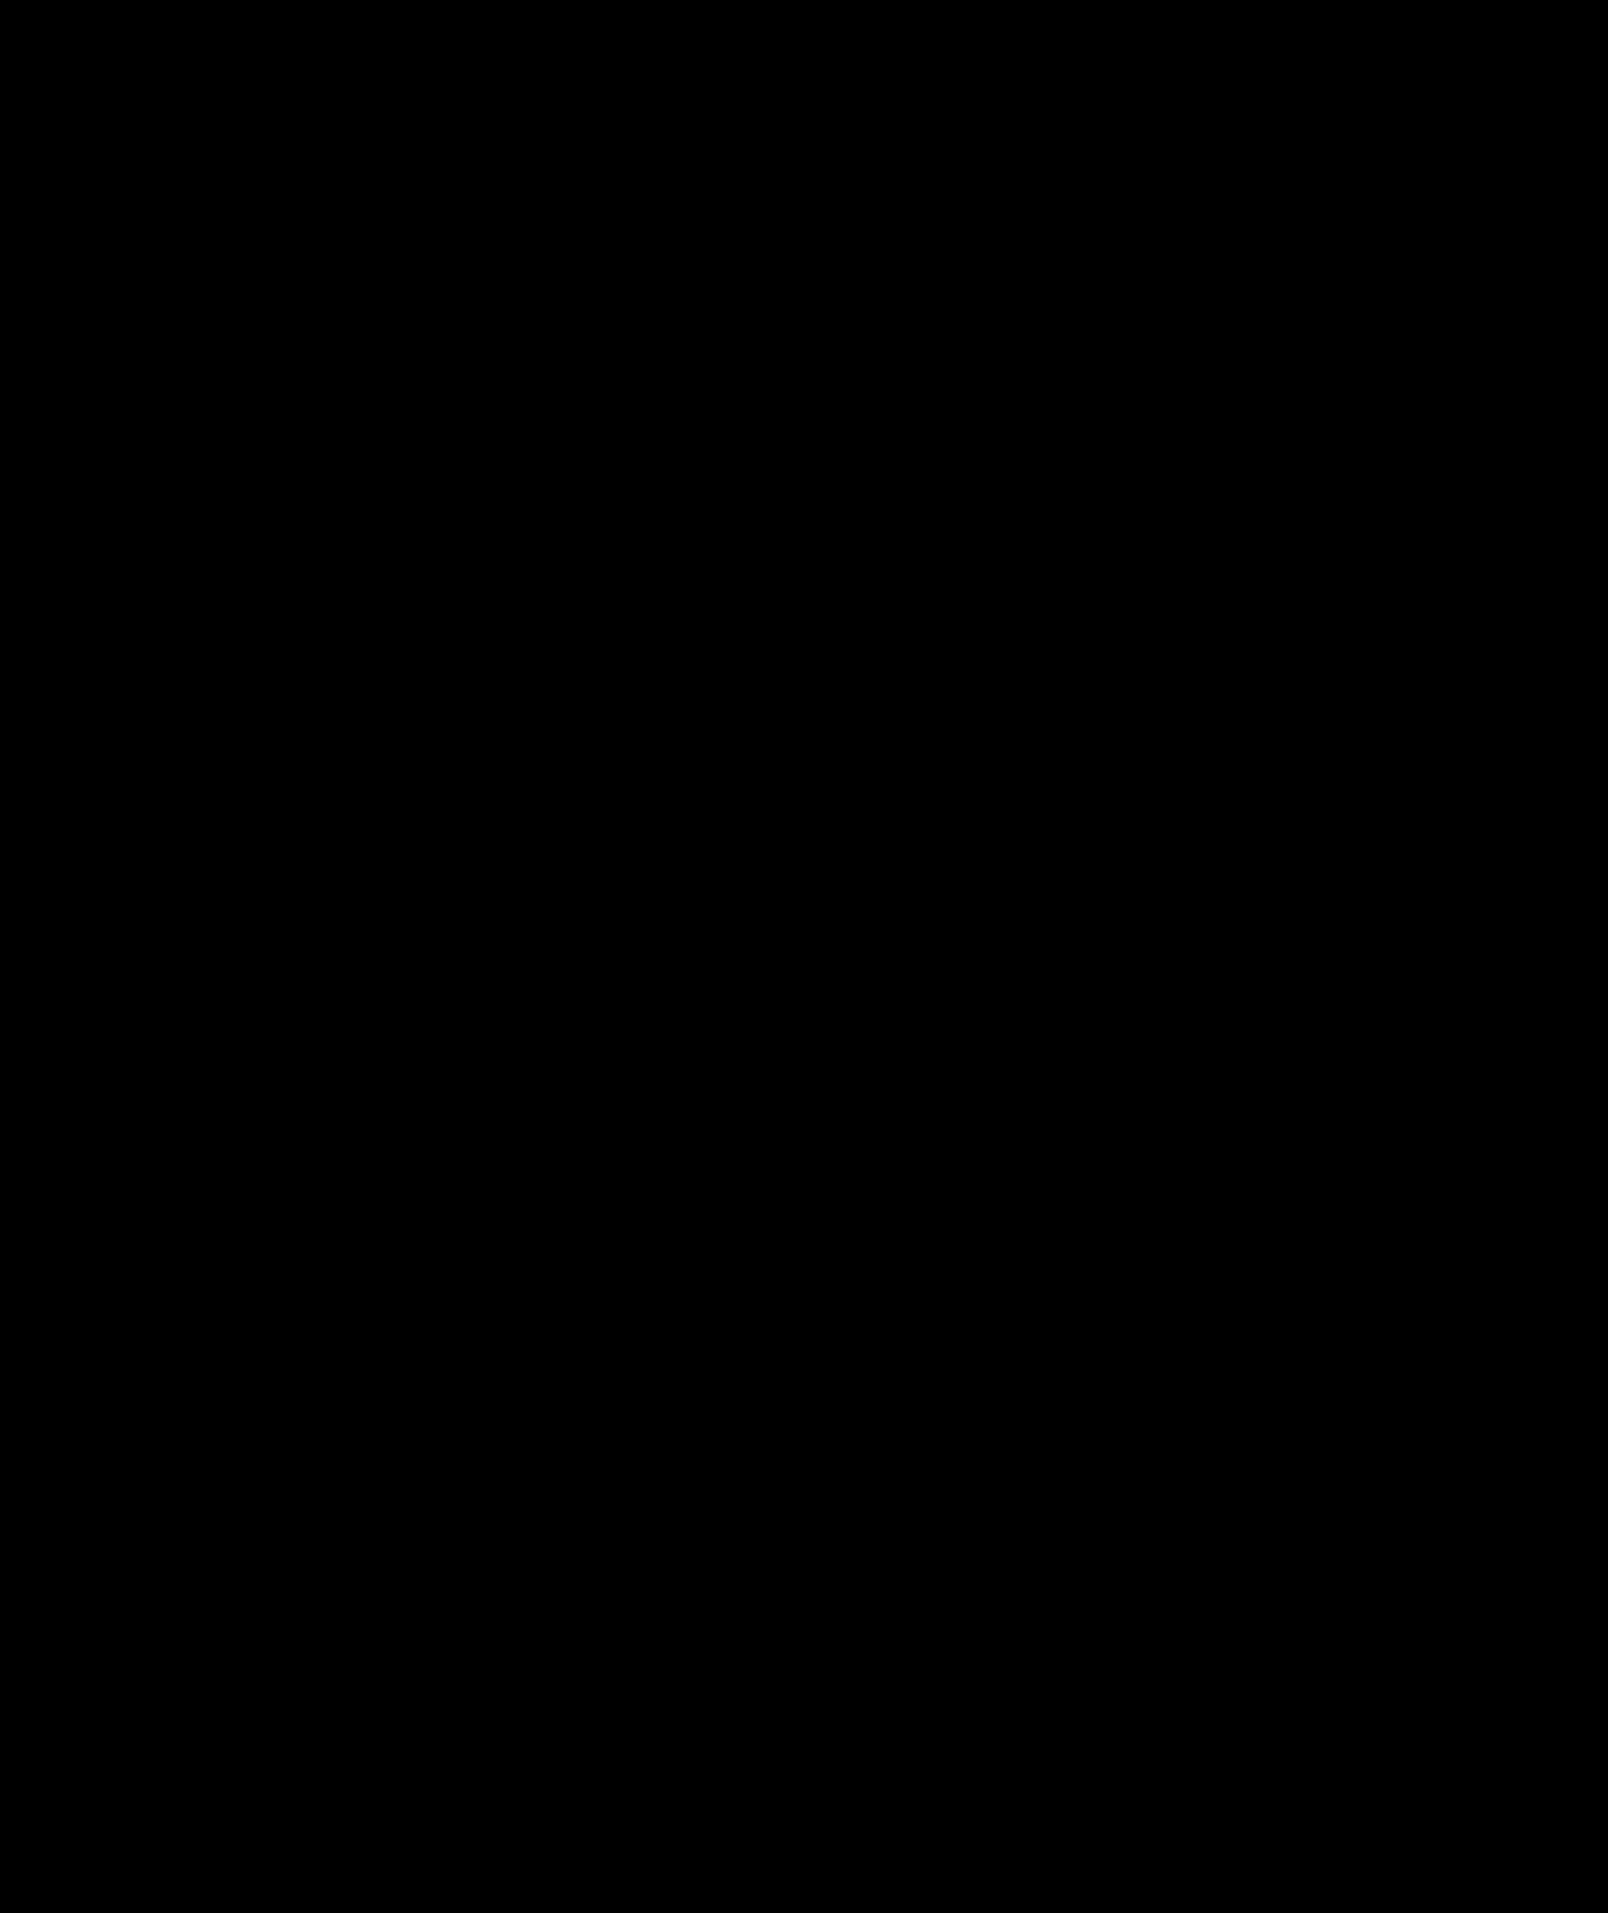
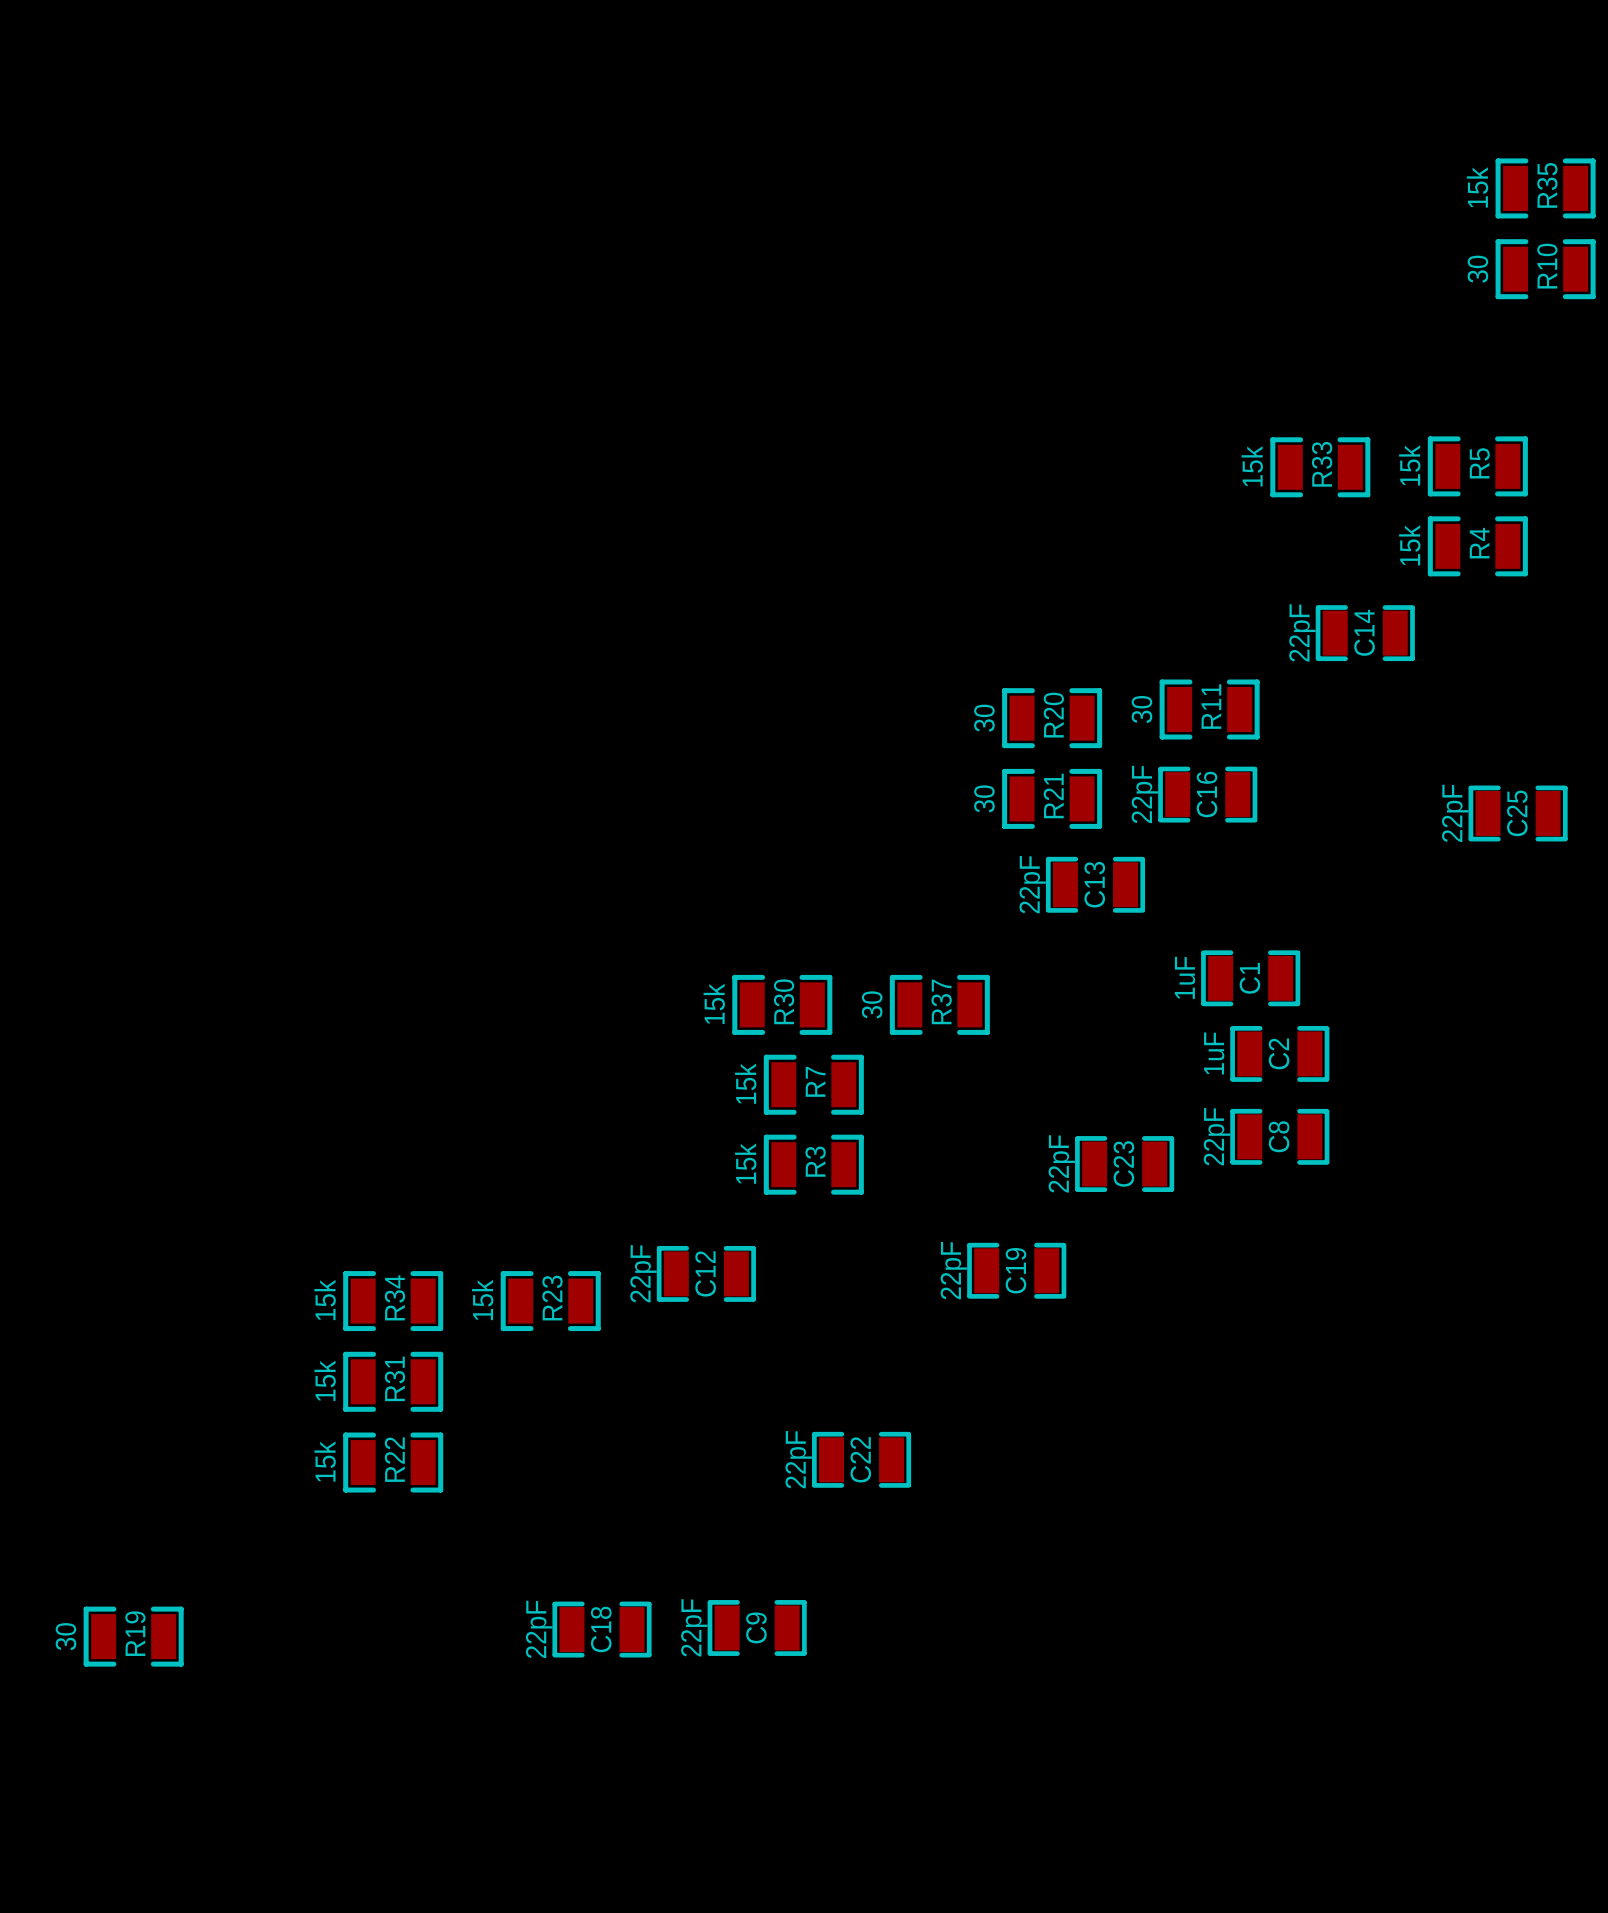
R35: none -> 15k (1545, 188)
R10: none -> 30 (1545, 269)
R5: none -> 15k (1477, 466)
R33: none -> 15k (1320, 467)
R4: none -> 15k (1477, 546)
C14: none -> 22pF (1365, 633)
R11: none -> 30 (1209, 709)
R20: none -> 30 (1052, 718)
C16: none -> 22pF (1207, 794)
R21: none -> 30 (1052, 798)
C25: none -> 22pF (1518, 813)
C13: none -> 22pF (1095, 884)
C1: none -> 1uF (1250, 978)
R30: none -> 15k (782, 1004)
R37: none -> 30 (939, 1004)
C2: none -> 1uF (1279, 1053)
R7: none -> 15k (813, 1084)
C8: none -> 22pF (1279, 1136)
R3: none -> 15k (813, 1164)
C23: none -> 22pF (1124, 1164)
C19: none -> 22pF (1016, 1270)
C12: none -> 22pF (706, 1273)
R34: none -> 15k (393, 1301)
R23: none -> 15k (550, 1301)
R31: none -> 15k (393, 1381)
C22: none -> 22pF (861, 1459)
R22: none -> 15k (393, 1462)
C9: none -> 22pF (757, 1627)
C18: none -> 22pF (602, 1629)
R19: none -> 30 (133, 1636)

